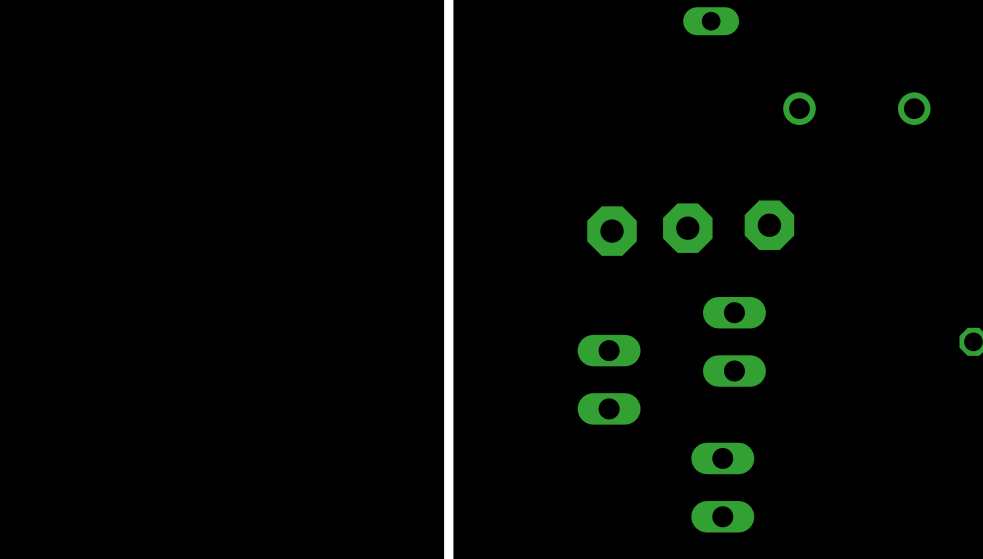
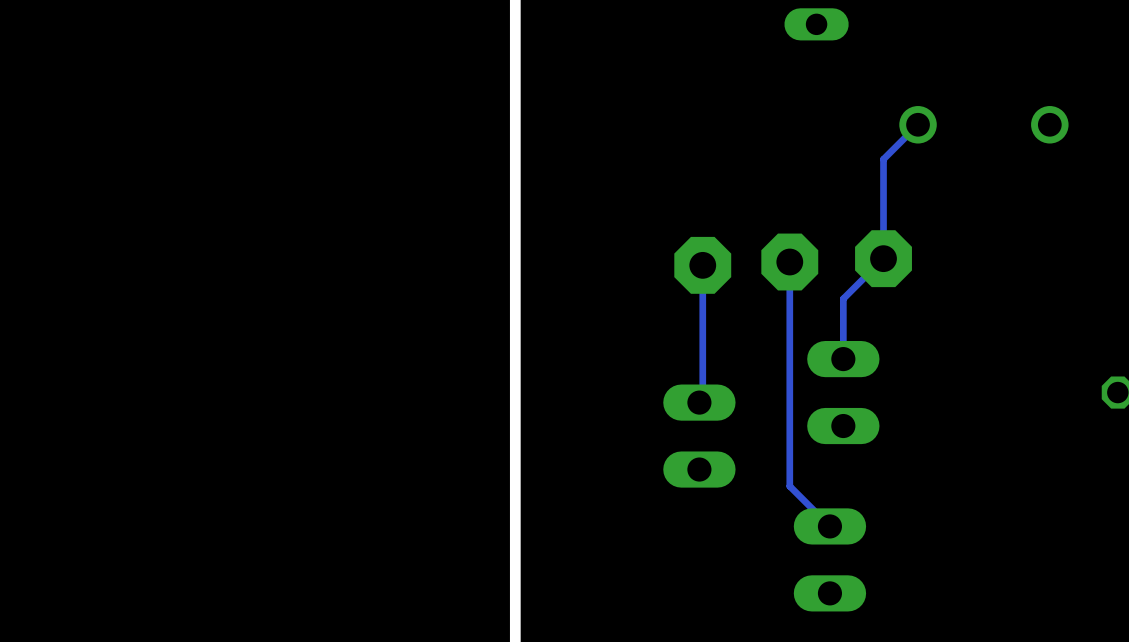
track: none -> (918, 124) (883, 159) (883, 258) (843, 298) (843, 359)
track: none -> (789, 262) (789, 486) (829, 526)
track: none -> (702, 265) (702, 399) (699, 402)

